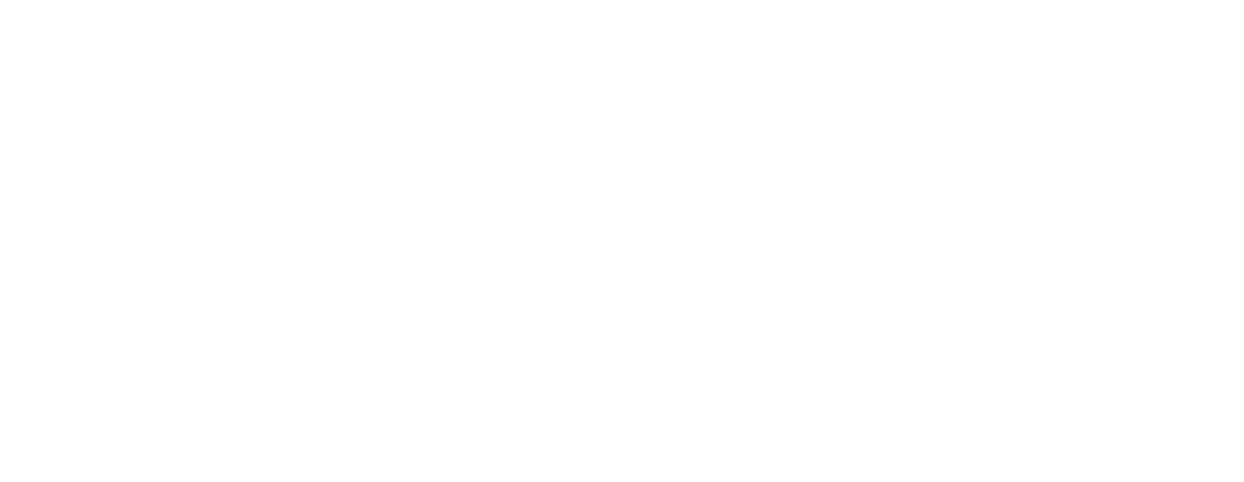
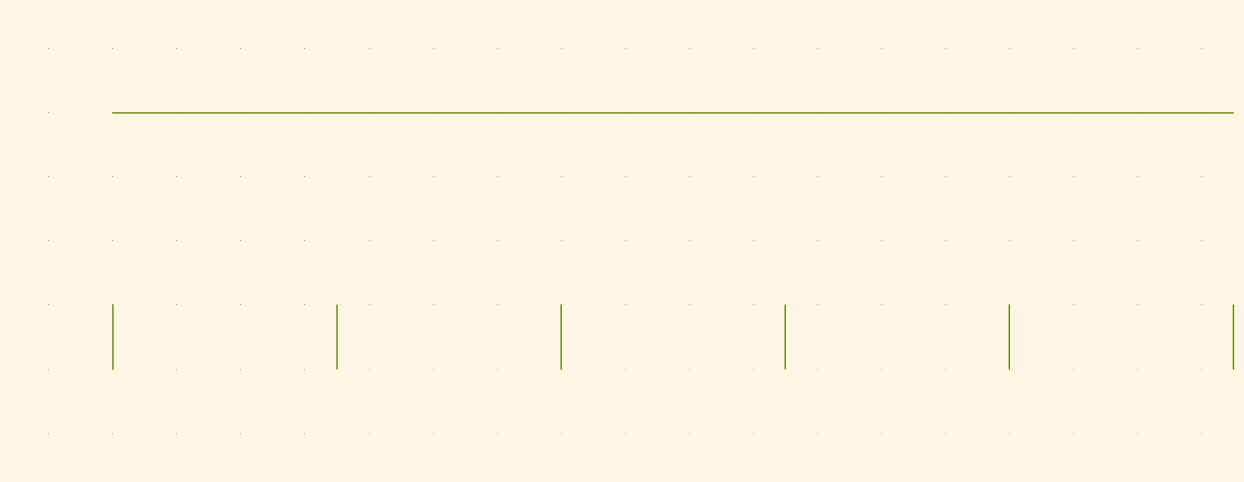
wire: none -> (112, 112) (1233, 112)
wire: none -> (112, 304) (112, 369)
wire: none -> (337, 304) (337, 369)
wire: none -> (561, 304) (561, 369)
wire: none -> (785, 304) (785, 369)
wire: none -> (1009, 304) (1009, 369)
wire: none -> (1233, 304) (1233, 369)

